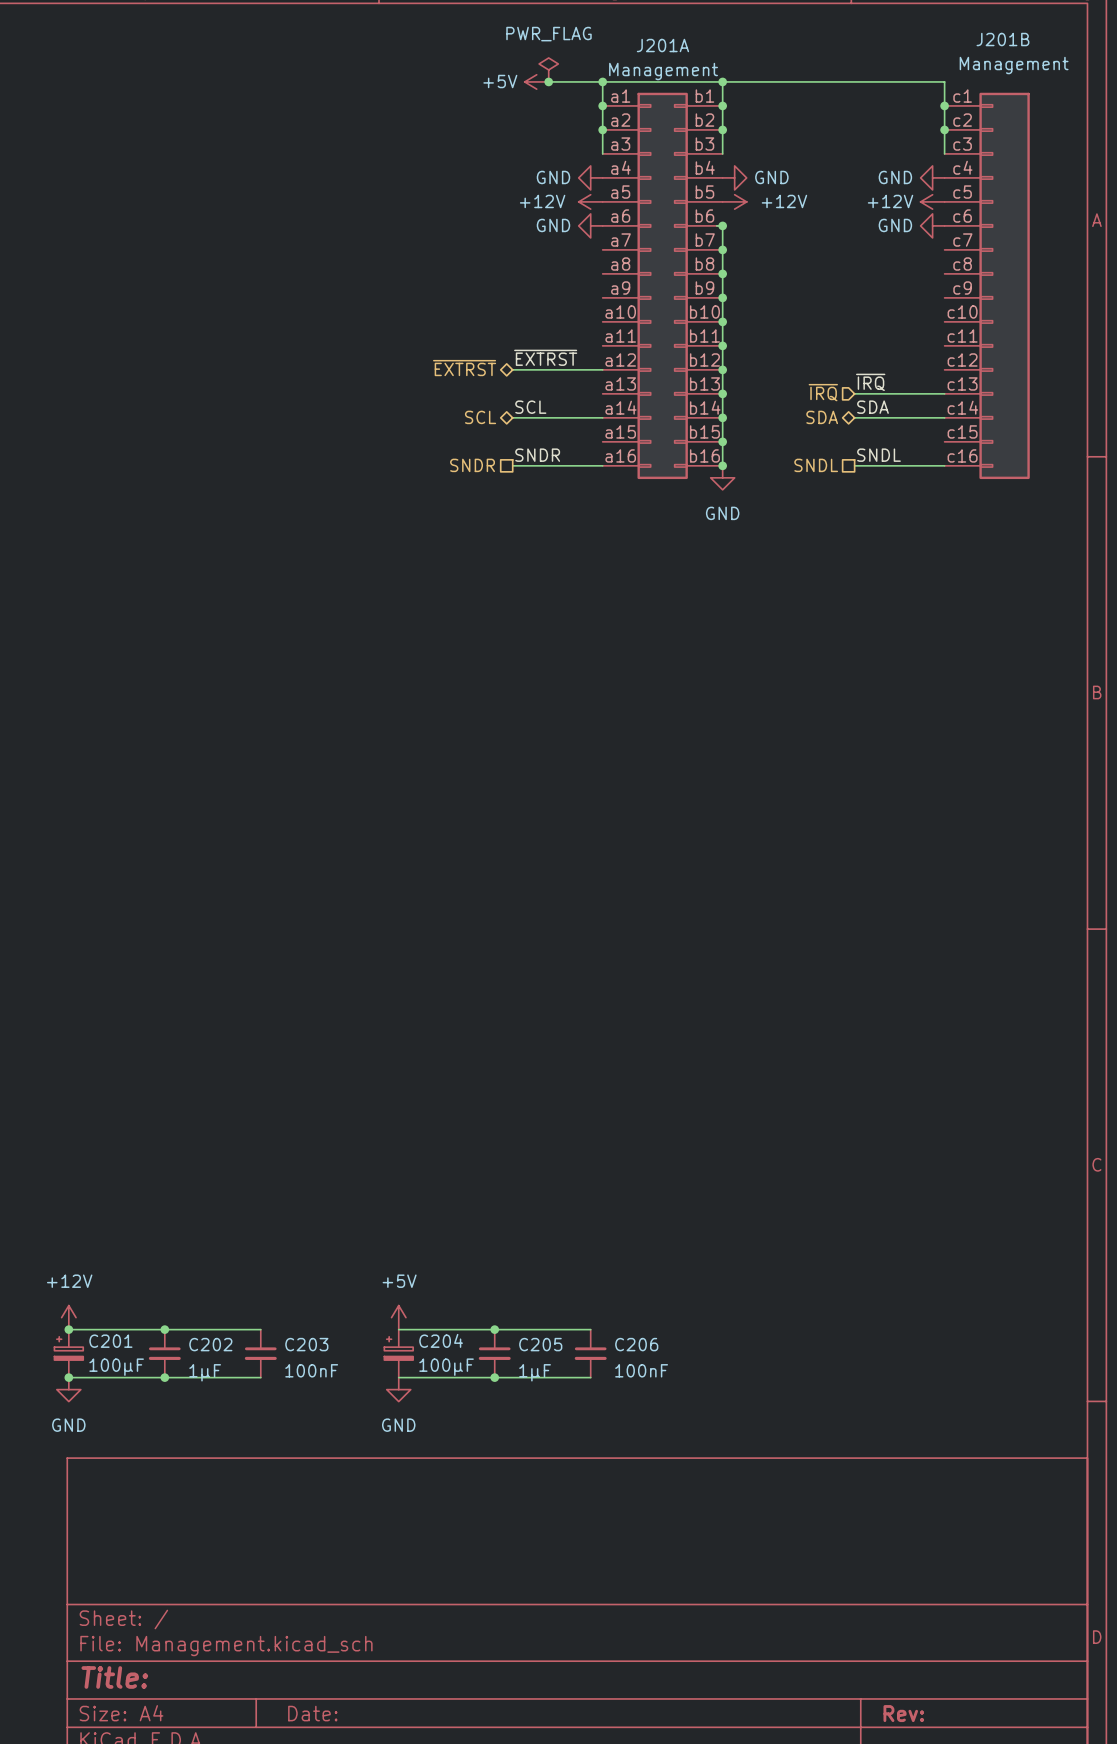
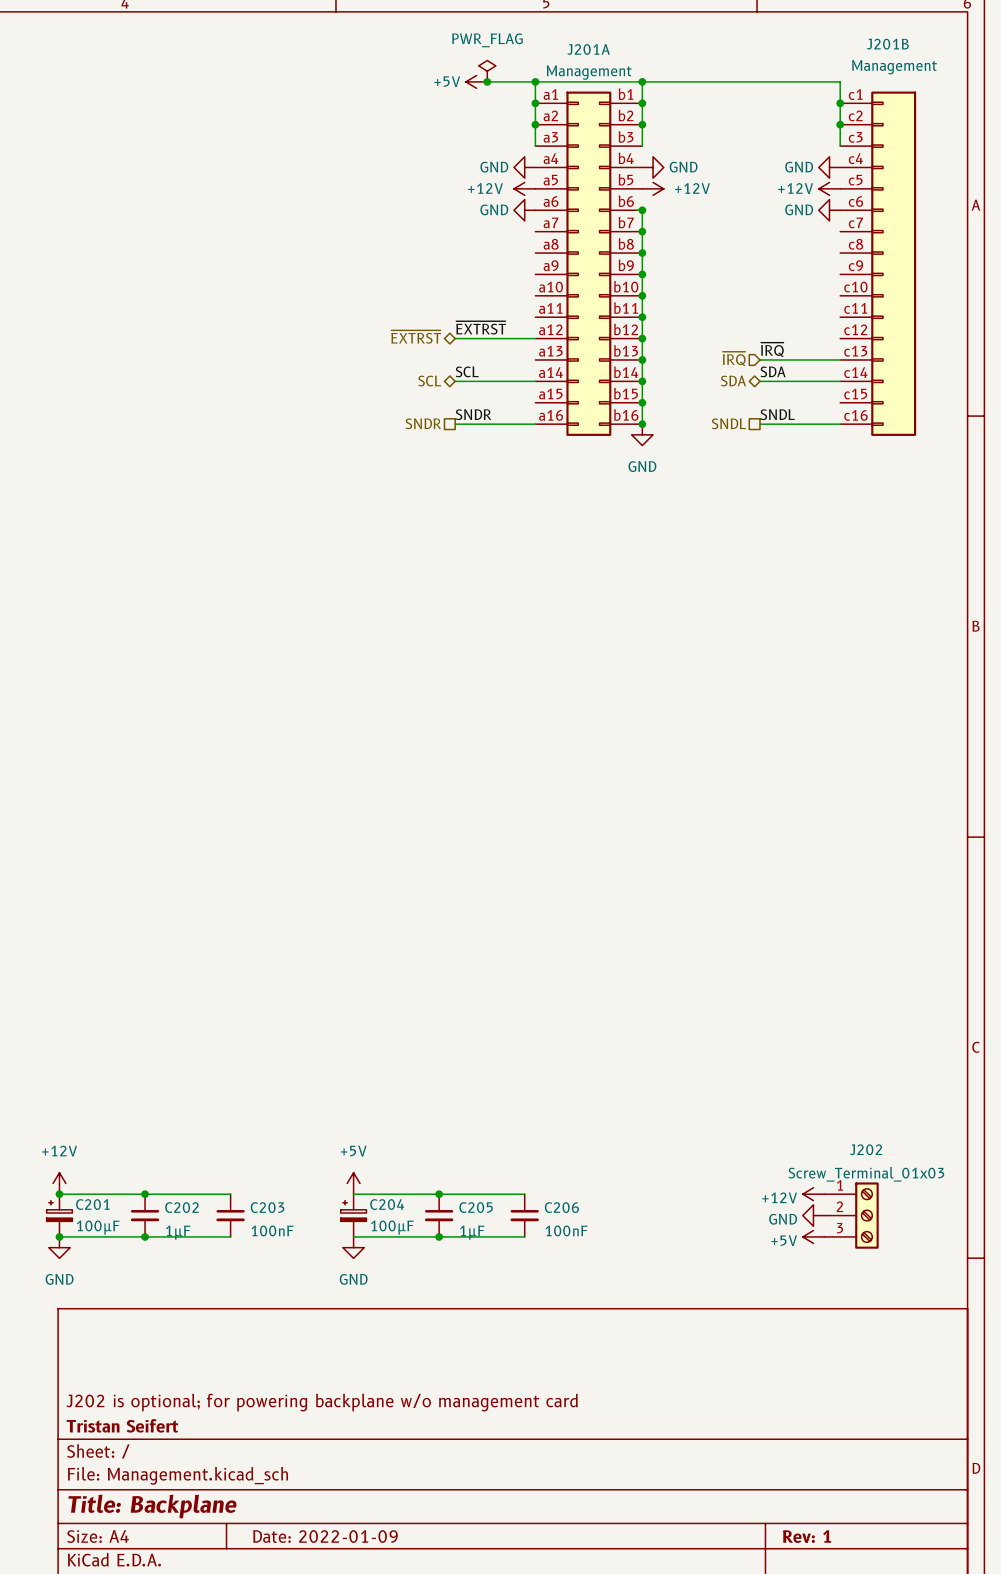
power symbol: none -> +12V (813, 1194)
power symbol: none -> GND (813, 1215)
J202: none -> Screw_Terminal_01x03 (851, 1215)
power symbol: none -> +5V (813, 1236)
title block: none -> J202 is optional; for powering backplane w/o management card (322, 1402)
title block: none -> Tristan Seifert (122, 1425)
title block: Title: (114, 1677) -> Title: Backplane (152, 1506)
title block: Date: (312, 1713) -> Date: 2022-01-09 (325, 1536)
title block: Rev: (903, 1713) -> Rev: 1 (807, 1536)

